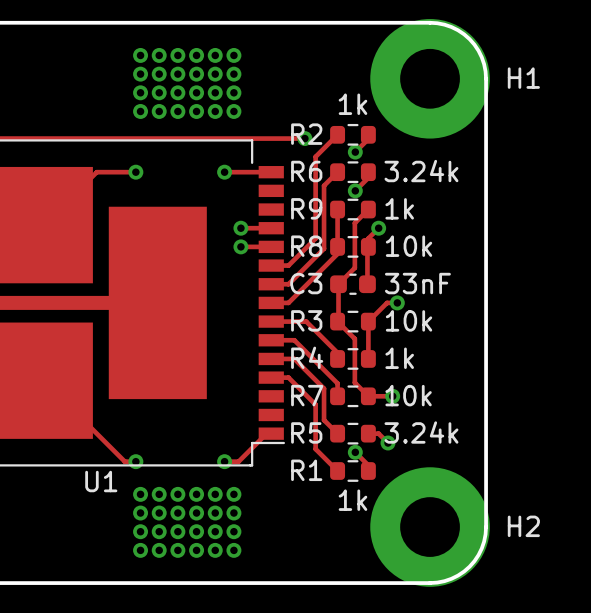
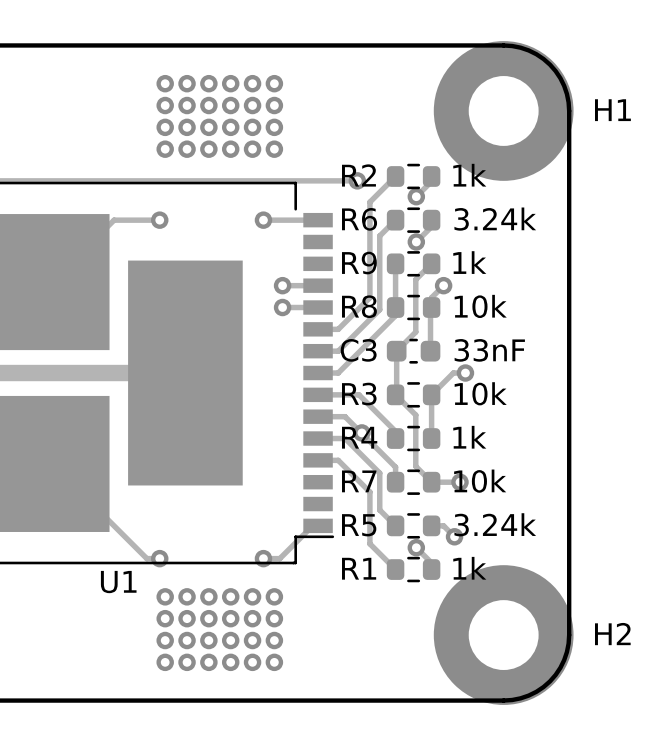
R2 value position: 1k (352, 104) -> 1k (469, 175)
via: none -> (361, 432)
R1 value position: 1k (352, 500) -> 1k (469, 568)

